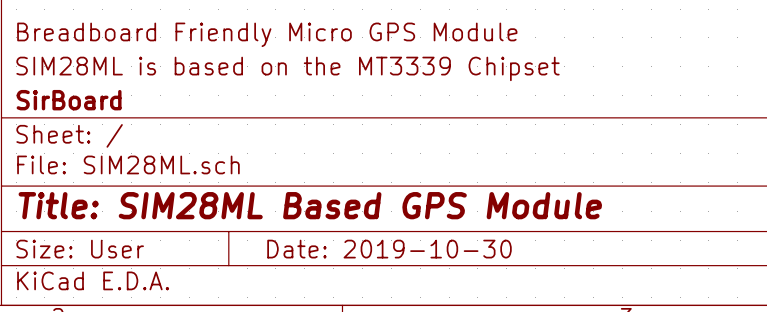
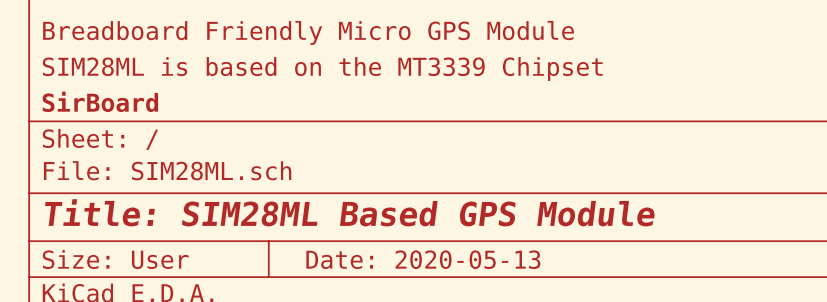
title block: Date: 2019-10-30 (389, 249) -> Date: 2020-05-13 (423, 259)

